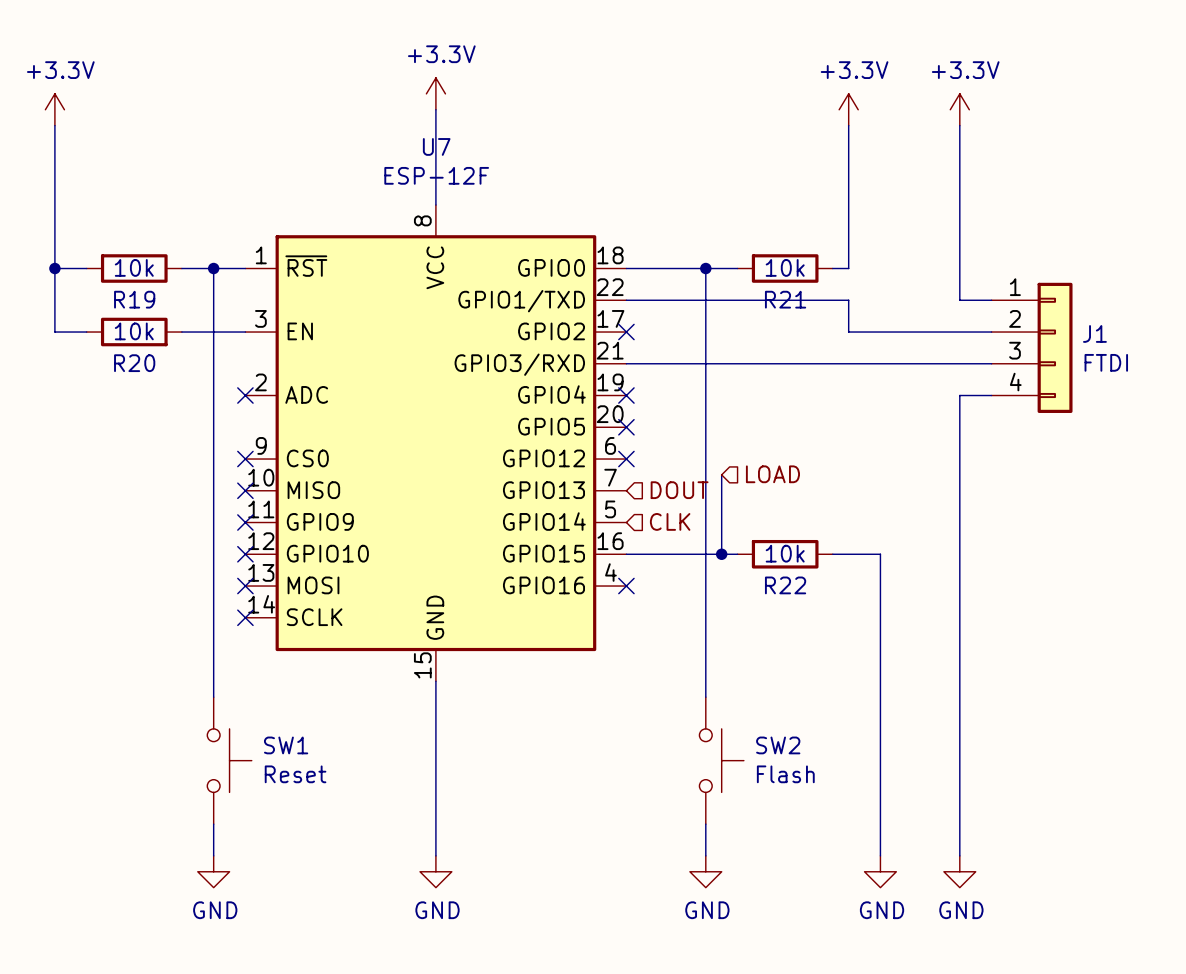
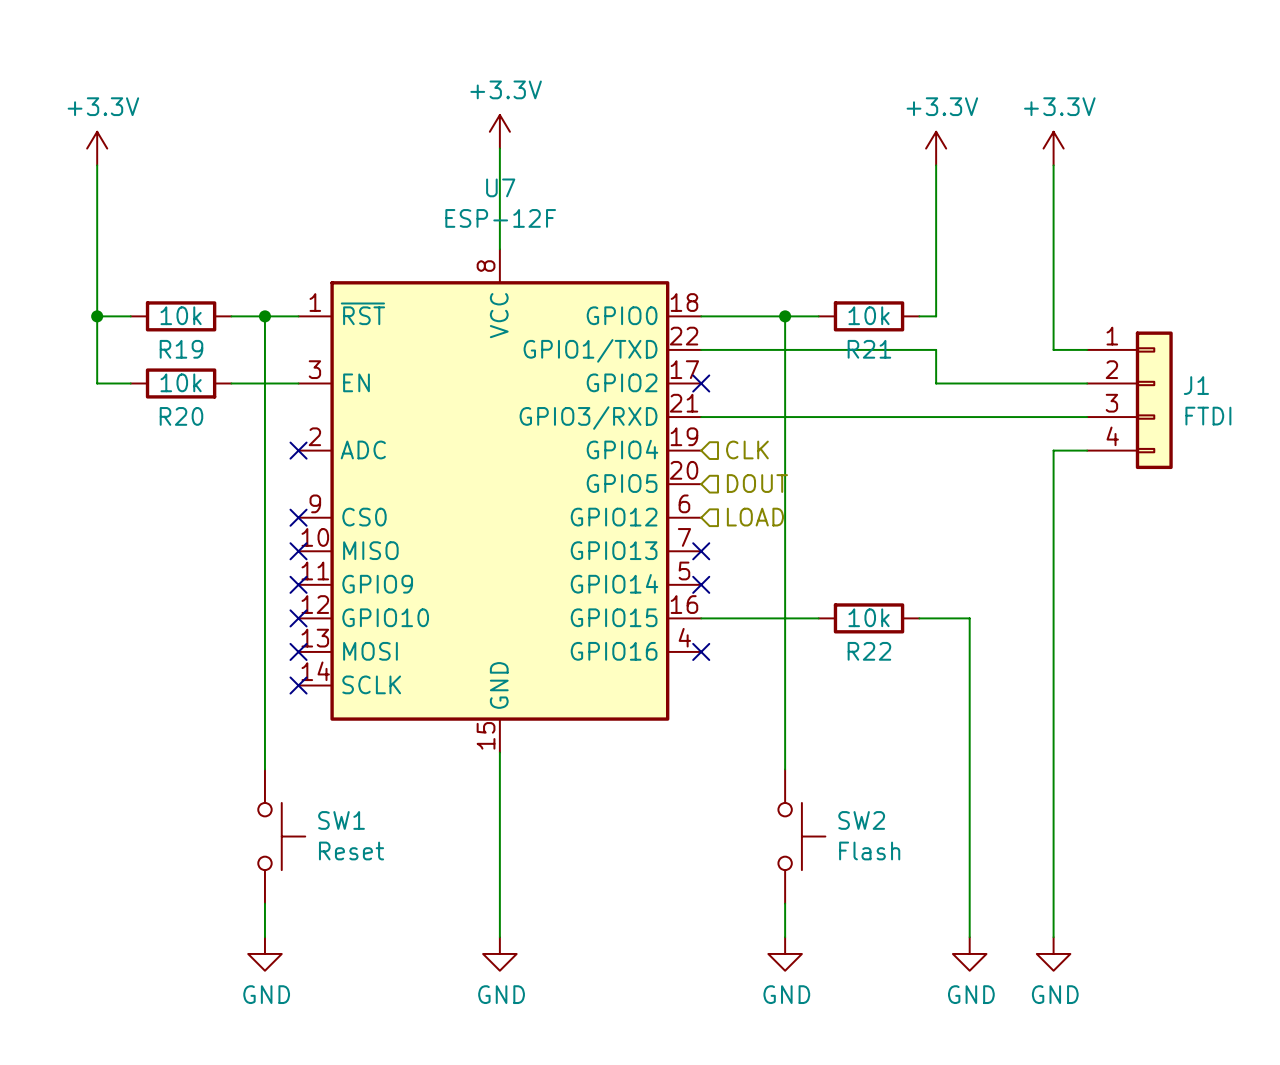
no-connect mark: (626, 395) -> none
no-connect mark: (626, 427) -> none
no-connect mark: (626, 459) -> none
wire: (721, 474) (721, 554) -> none
hierarchical label position: LOAD (772, 474) -> LOAD (755, 517)
no-connect mark: none -> (701, 551)
hierarchical label position: DOUT (679, 490) -> DOUT (757, 483)
hierarchical label position: CLK (670, 521) -> CLK (747, 449)
no-connect mark: none -> (701, 584)
junction: (721, 554) -> none

